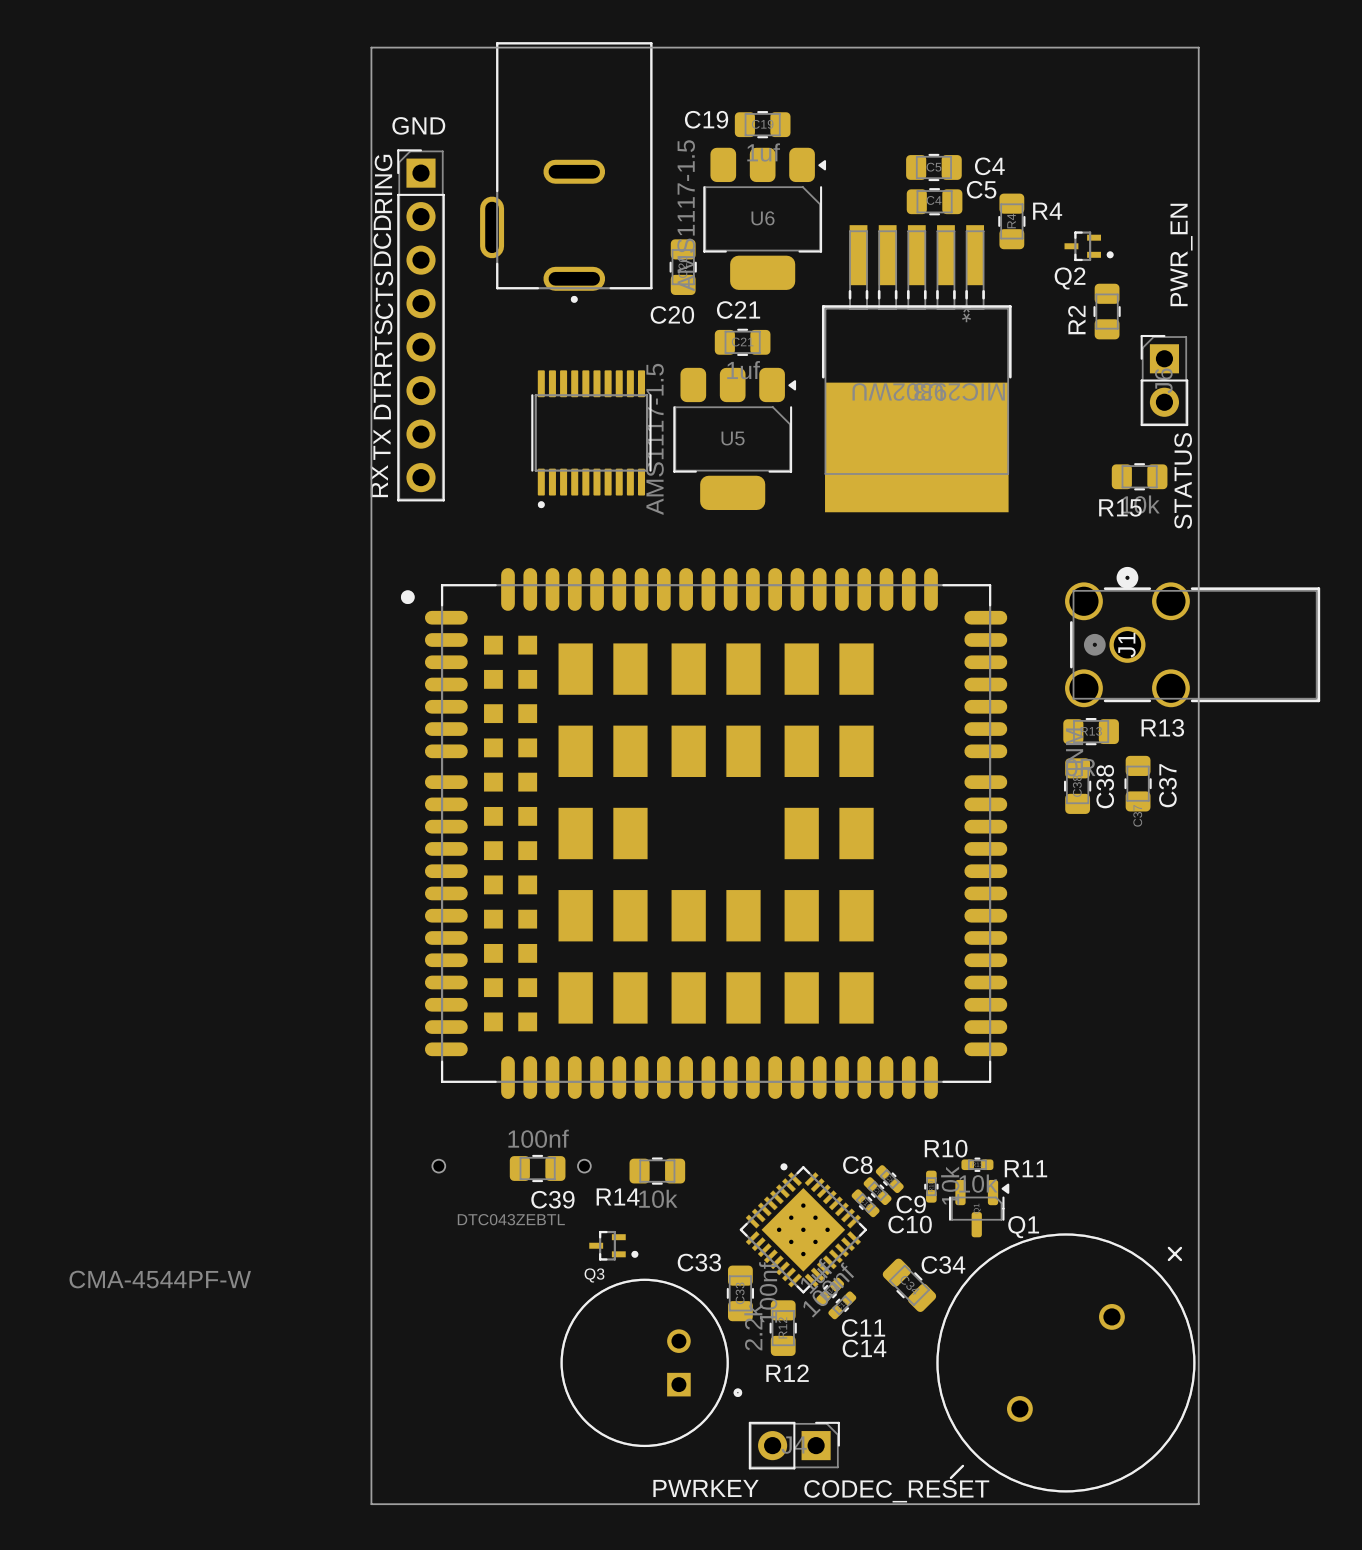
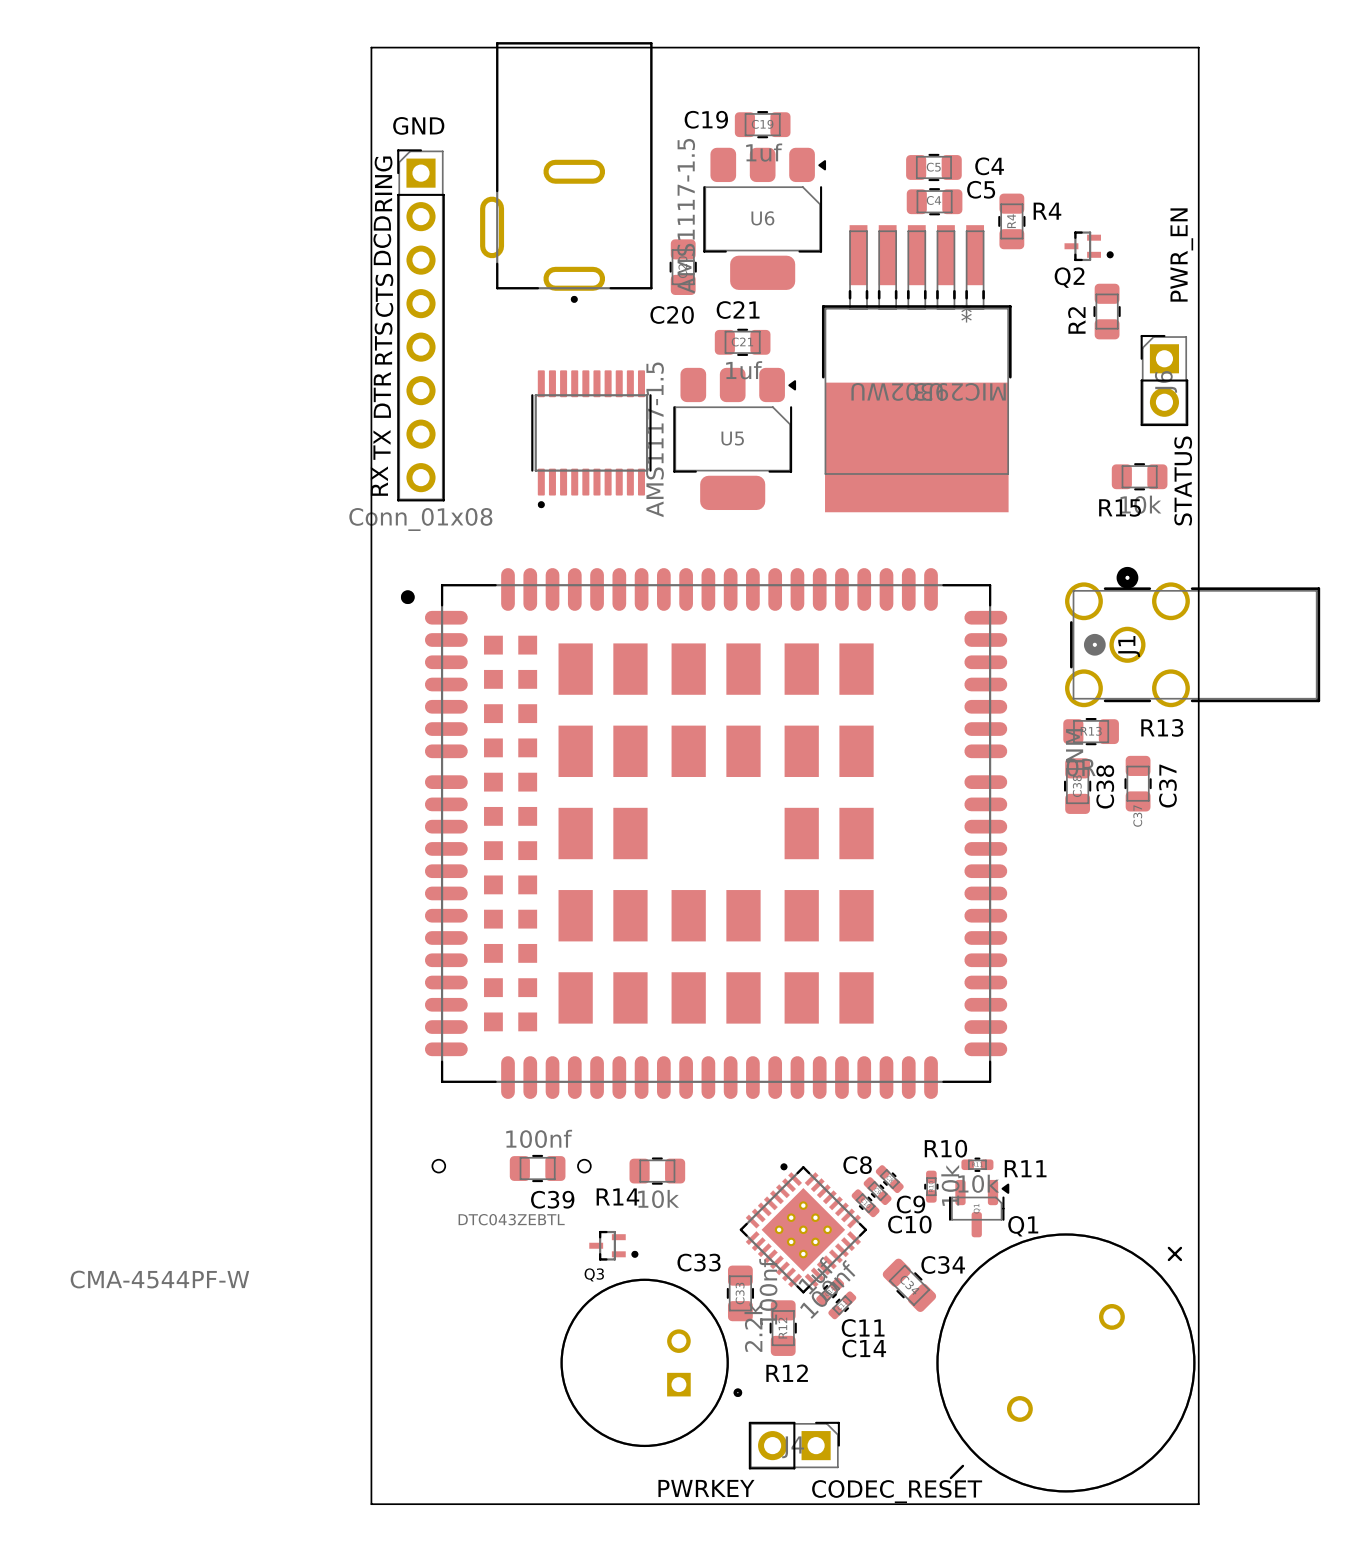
GND value: none -> Conn_01x08 (420, 519)

